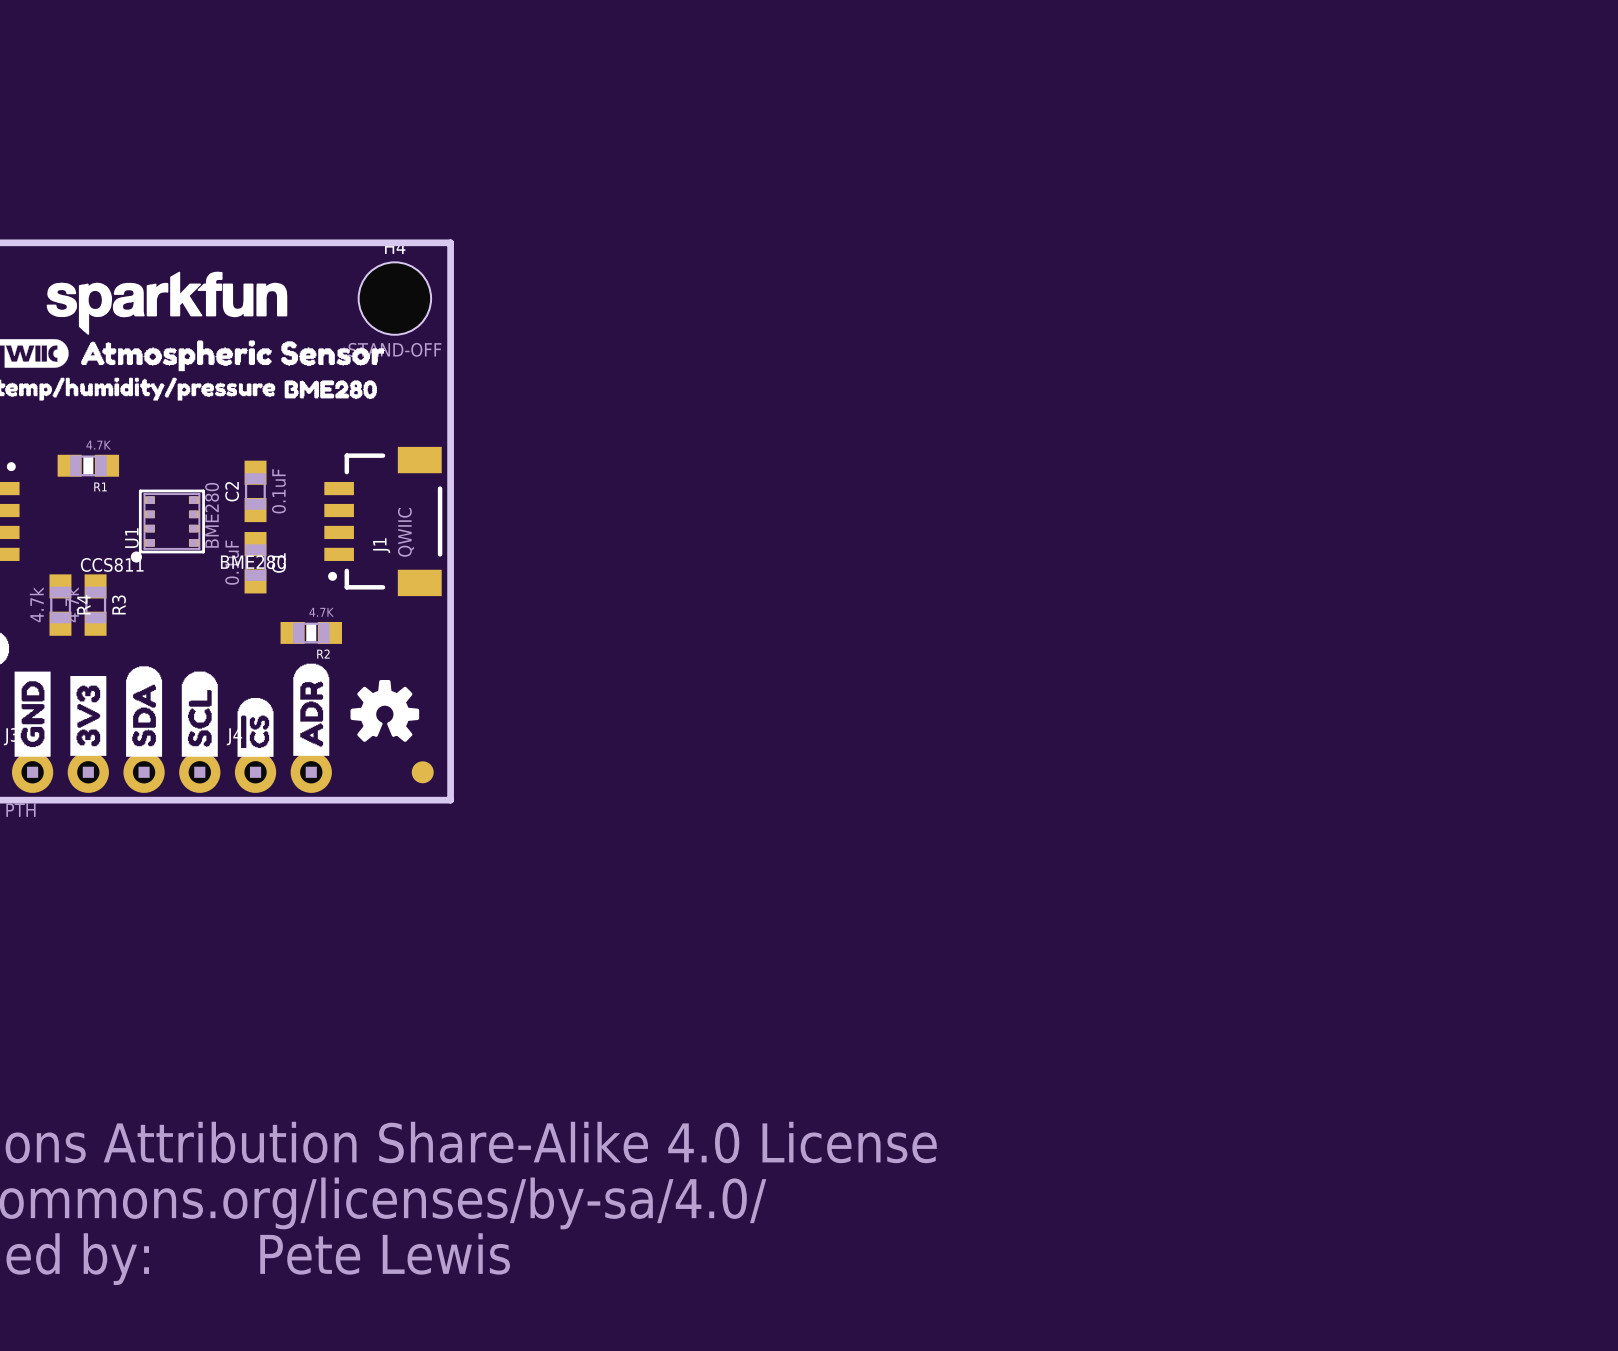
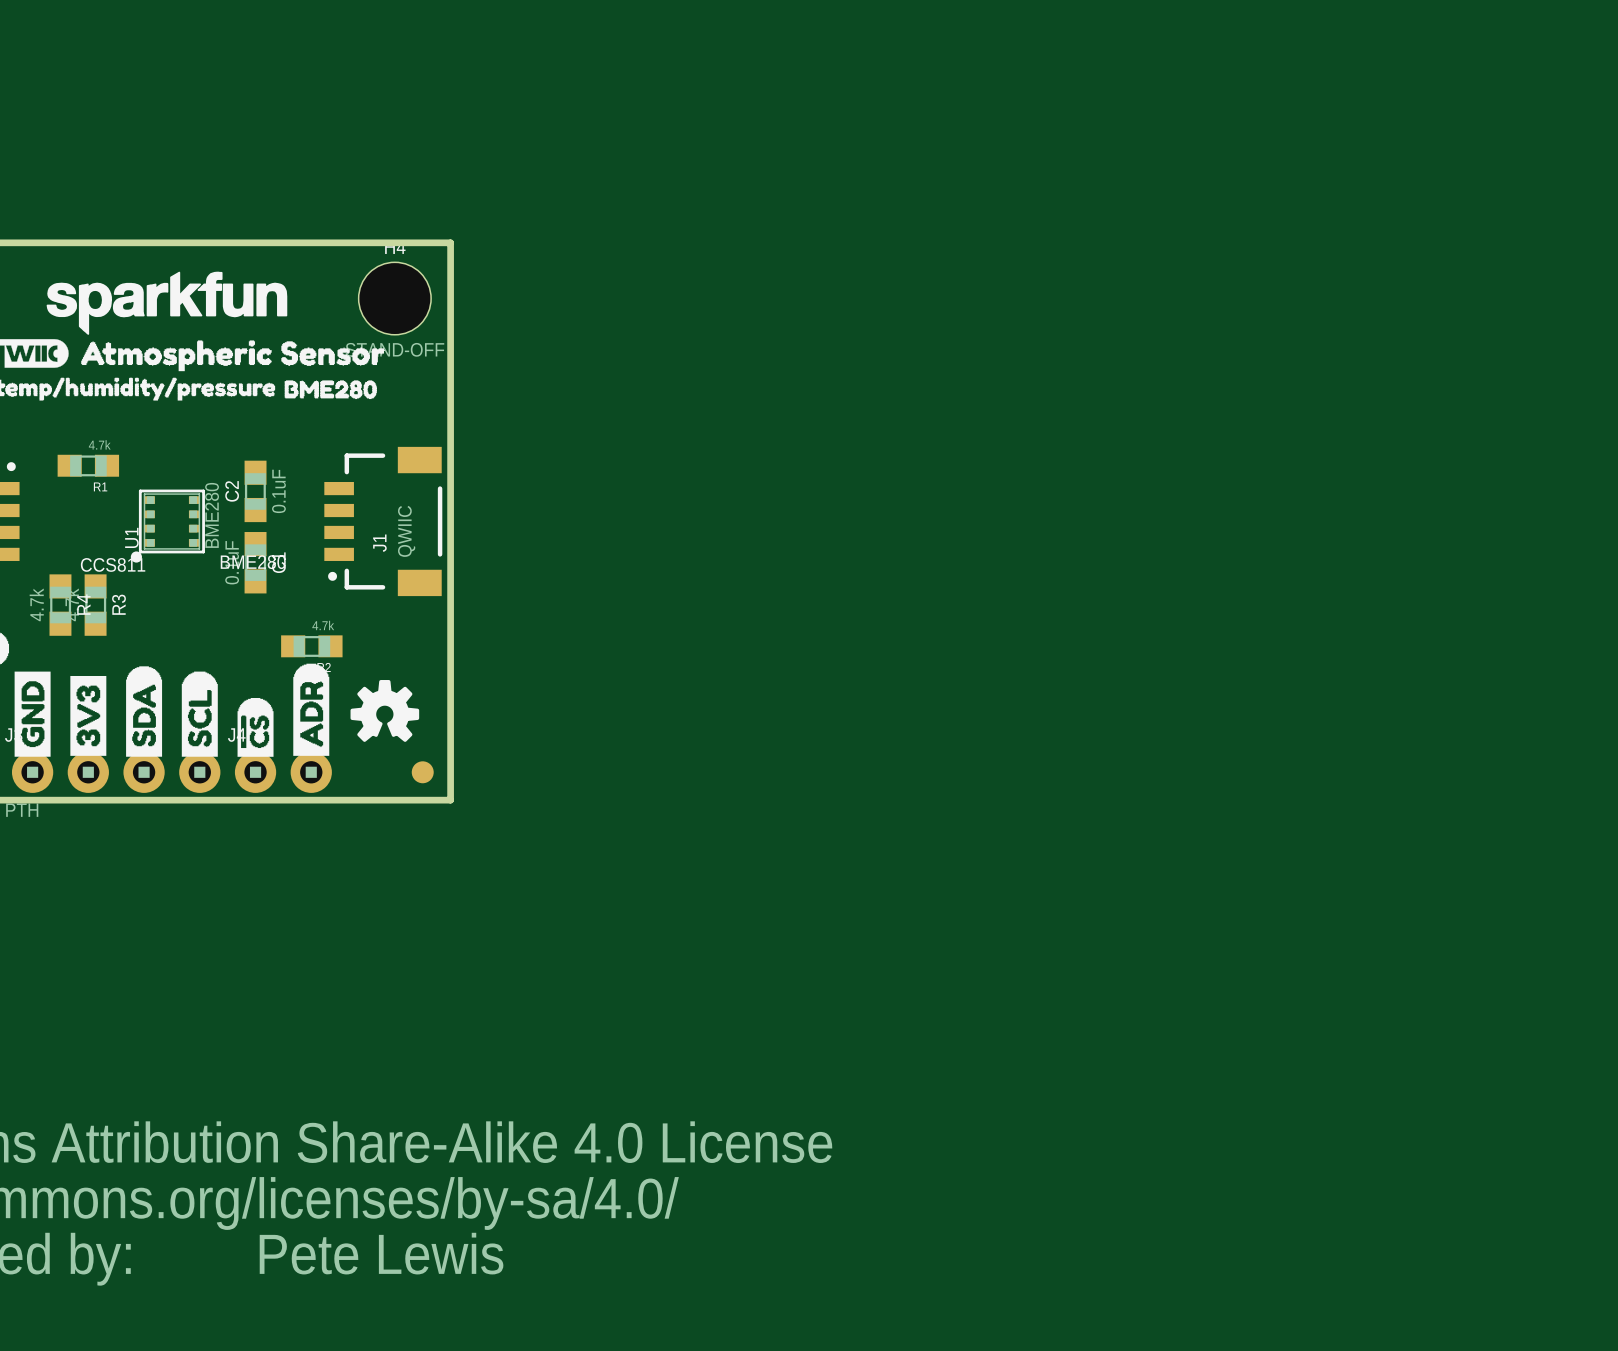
R1 value: 4.7K (98, 445) -> 4.7k (99, 444)
R1 footprint: [57, 454, 120, 477] -> [57, 454, 120, 477]
R2 value: 4.7K (321, 612) -> 4.7k (323, 625)
R2 footprint: [280, 621, 342, 644] -> [281, 635, 343, 658]

